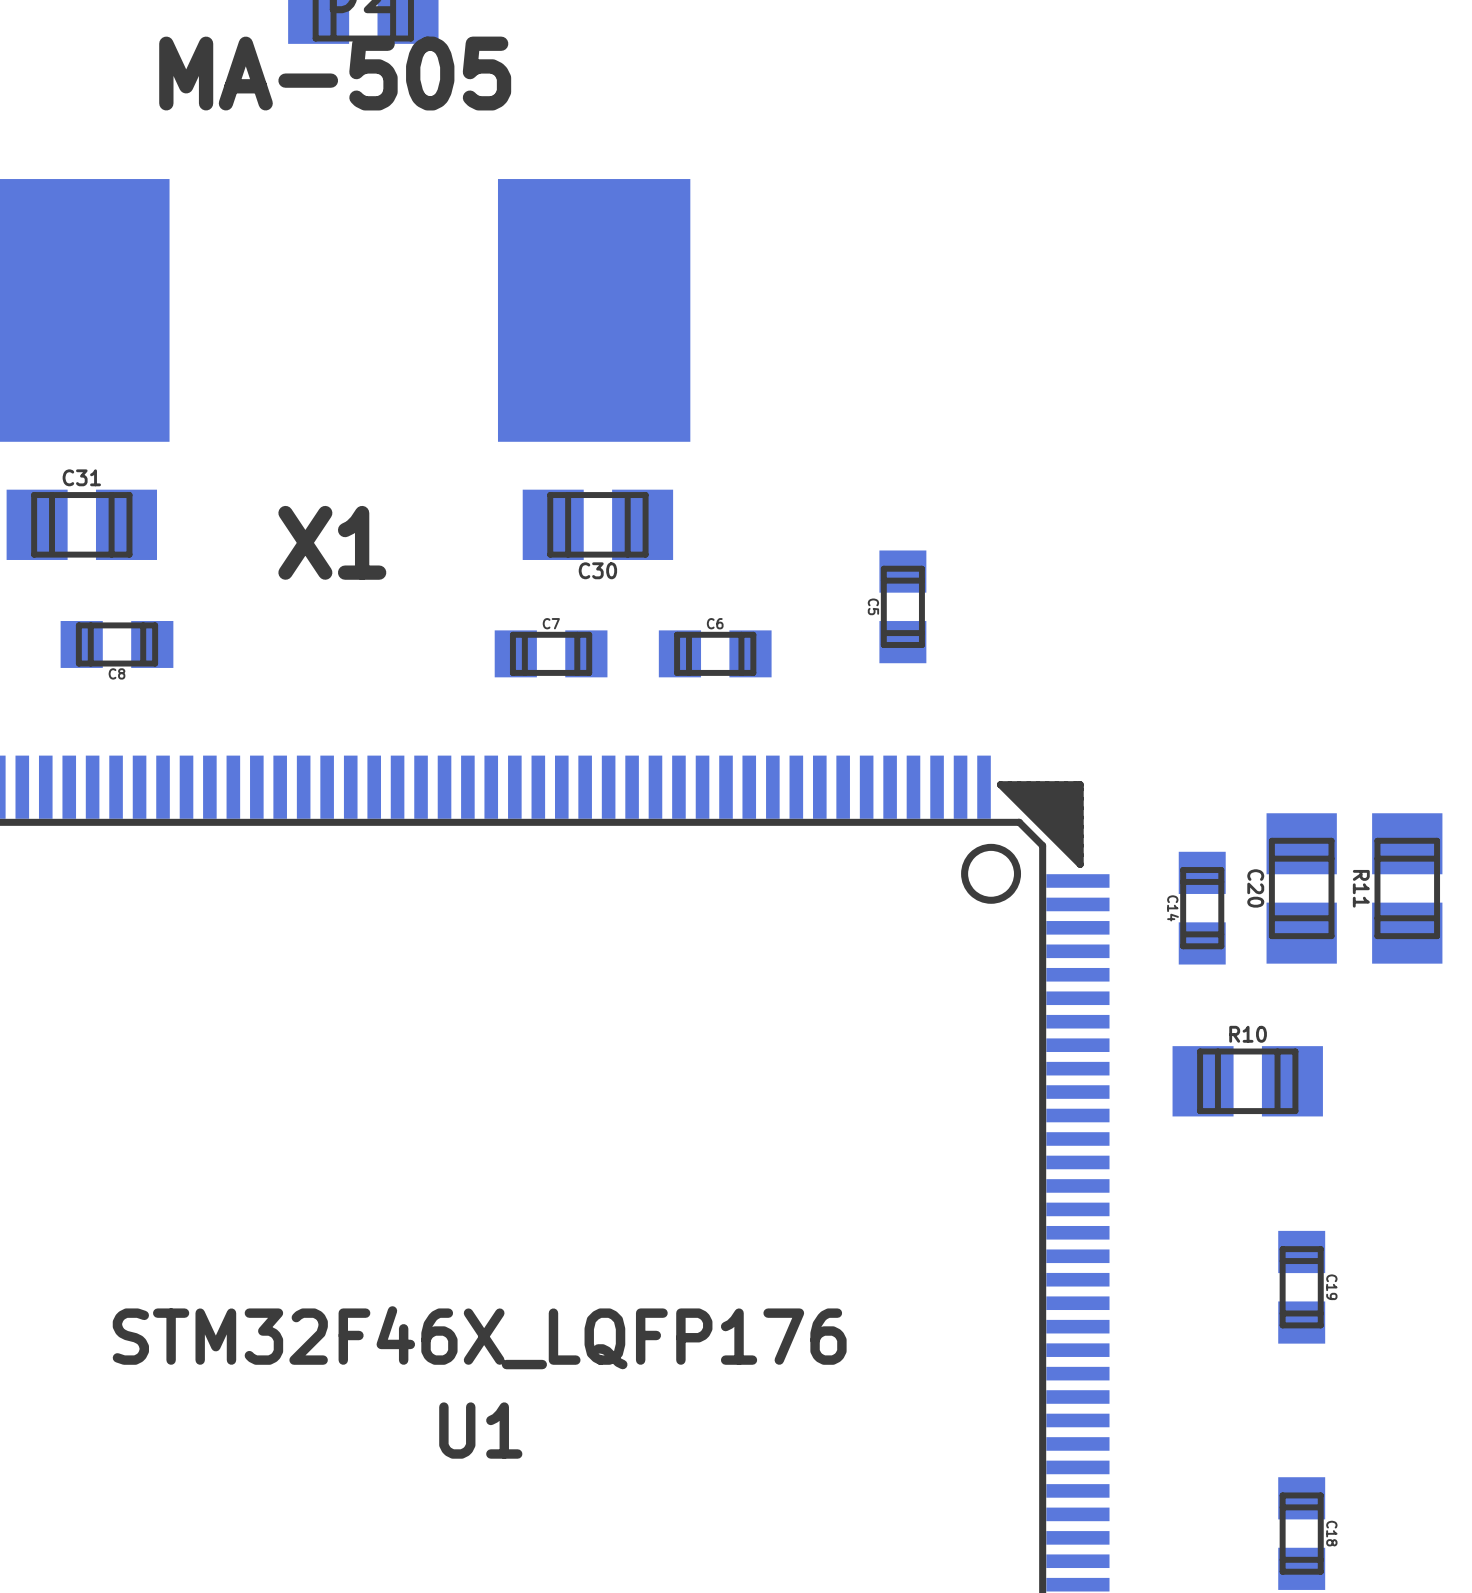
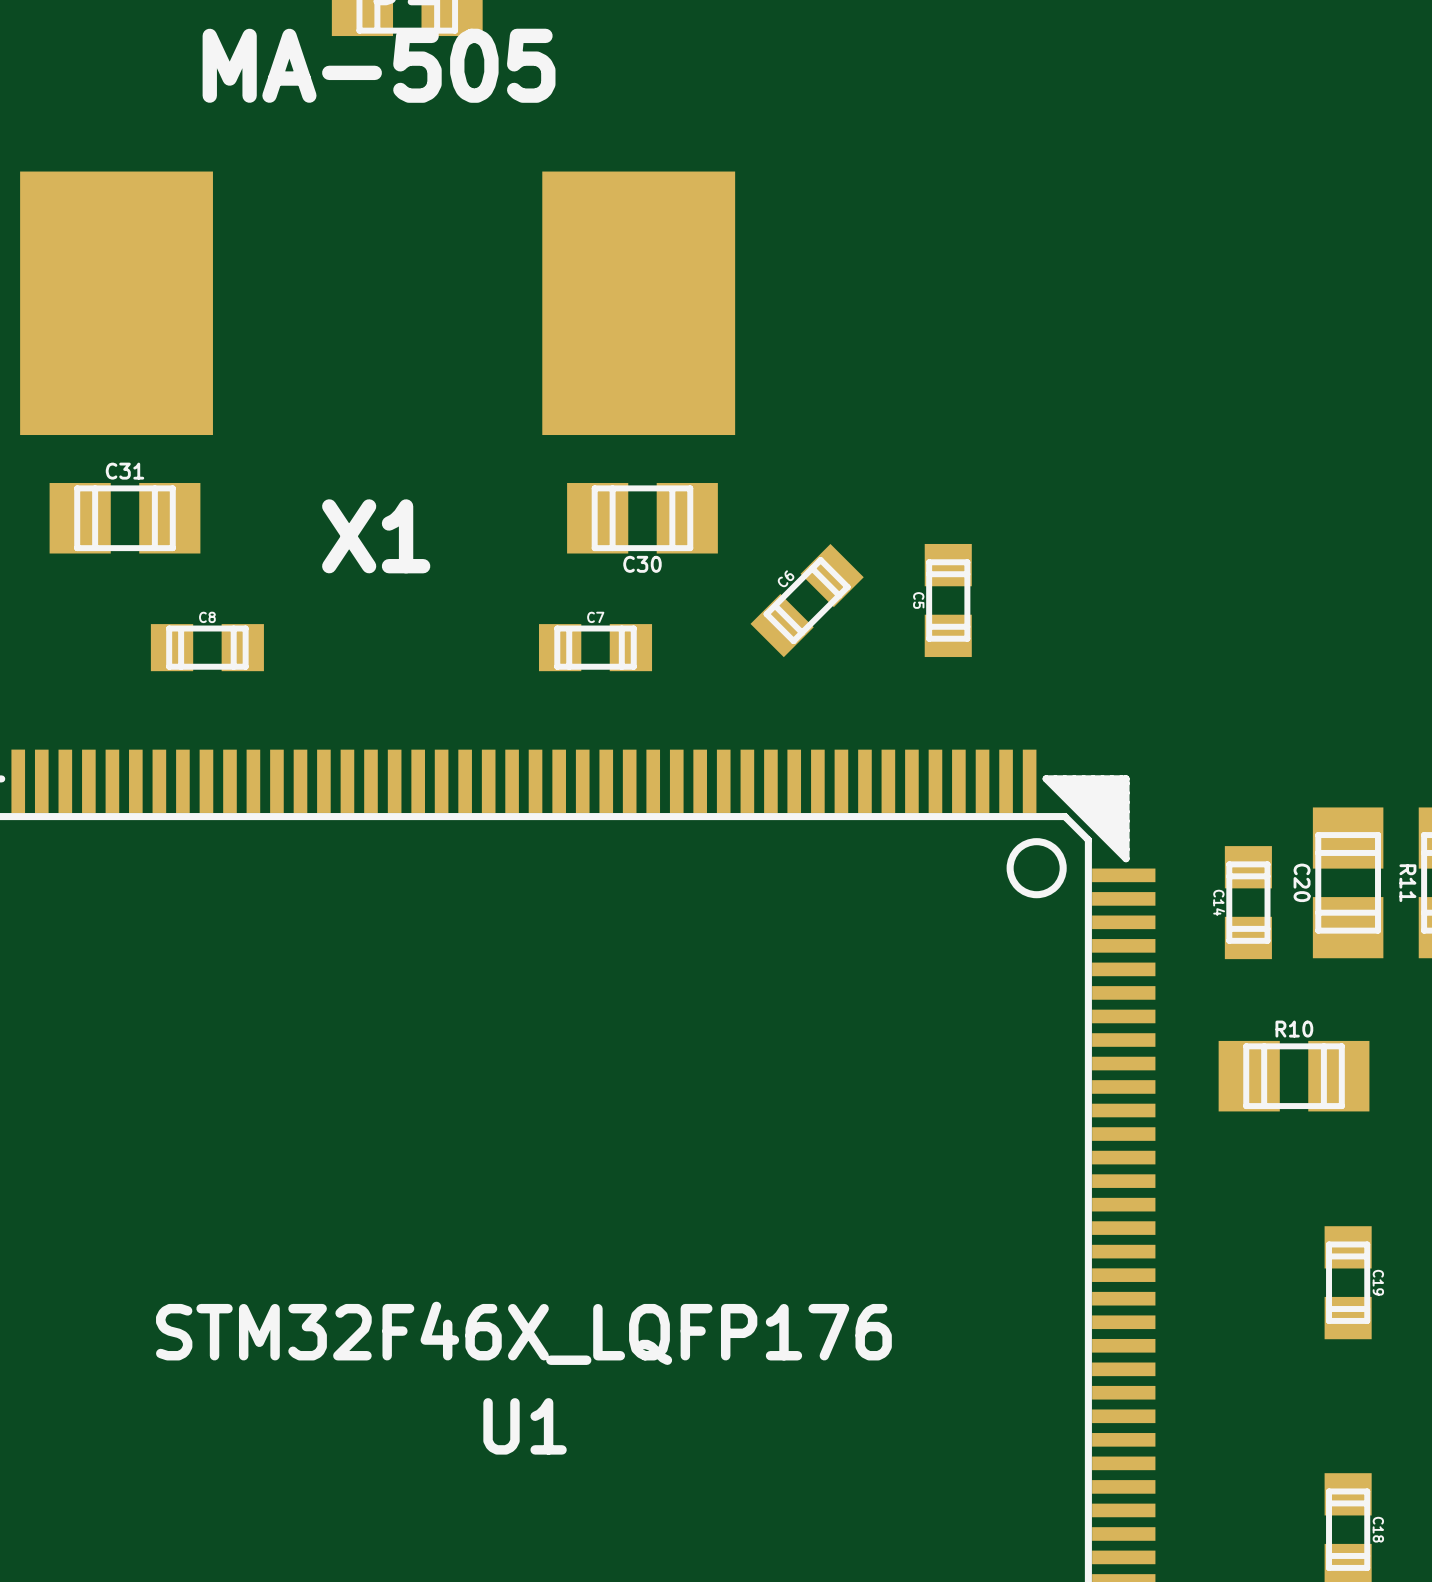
C8 rotation: 0° (116, 644) -> 180° (207, 647)
C6 rotation: 0° (715, 653) -> 45° counterclockwise (807, 600)

